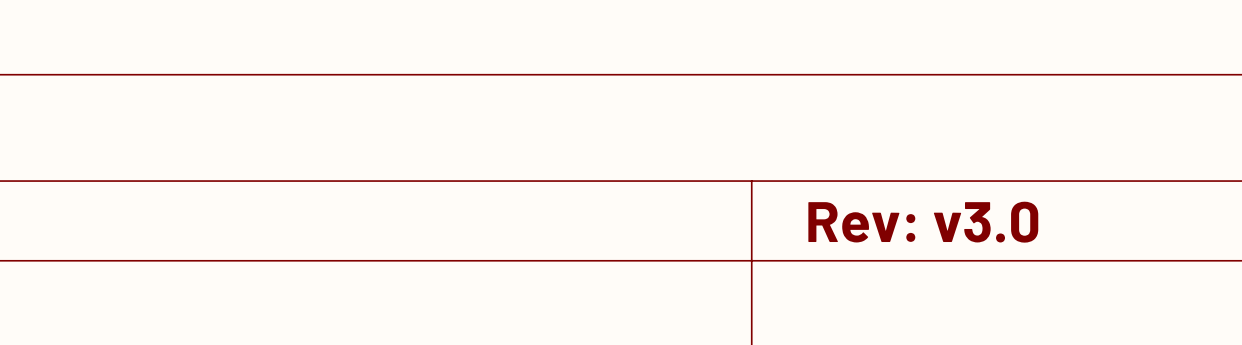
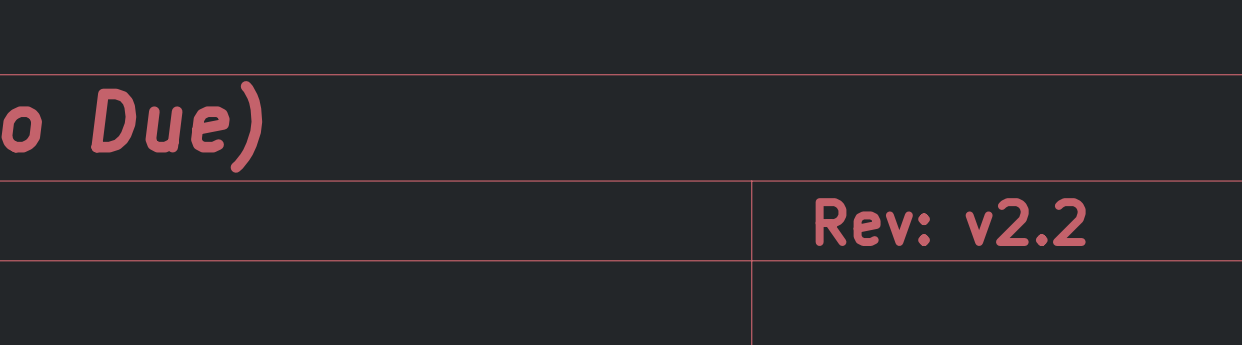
title block: Rev: v3.0 (923, 222) -> Rev: v2.2 (950, 222)

